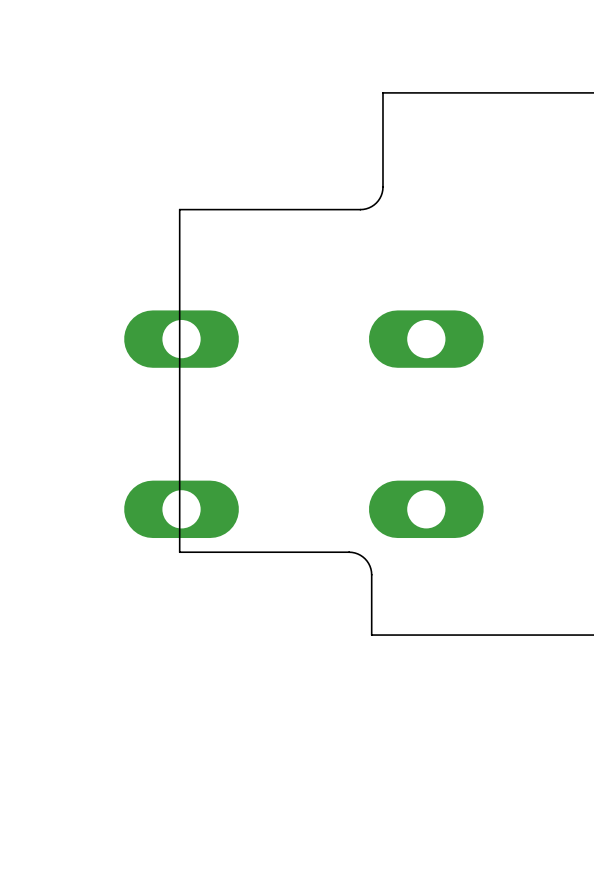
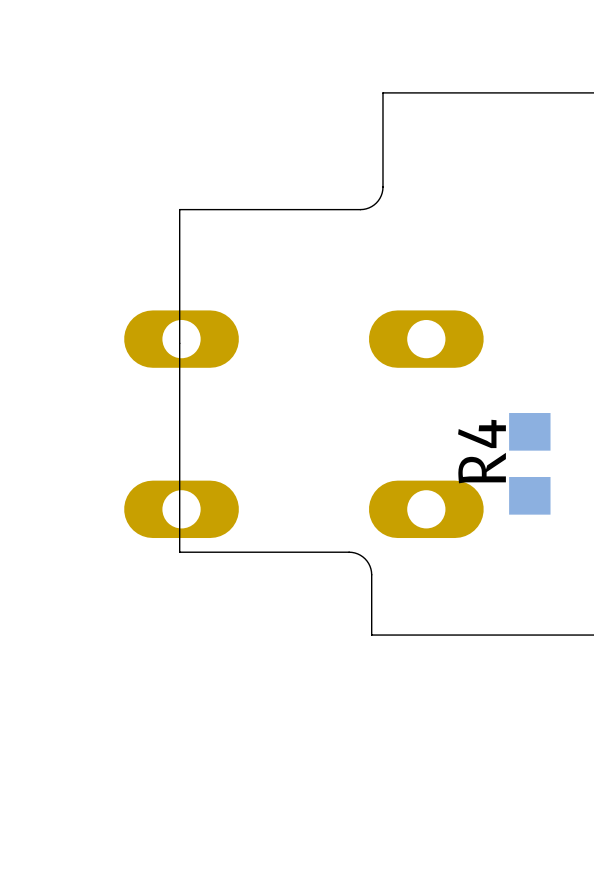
R4: none -> (529, 463)

